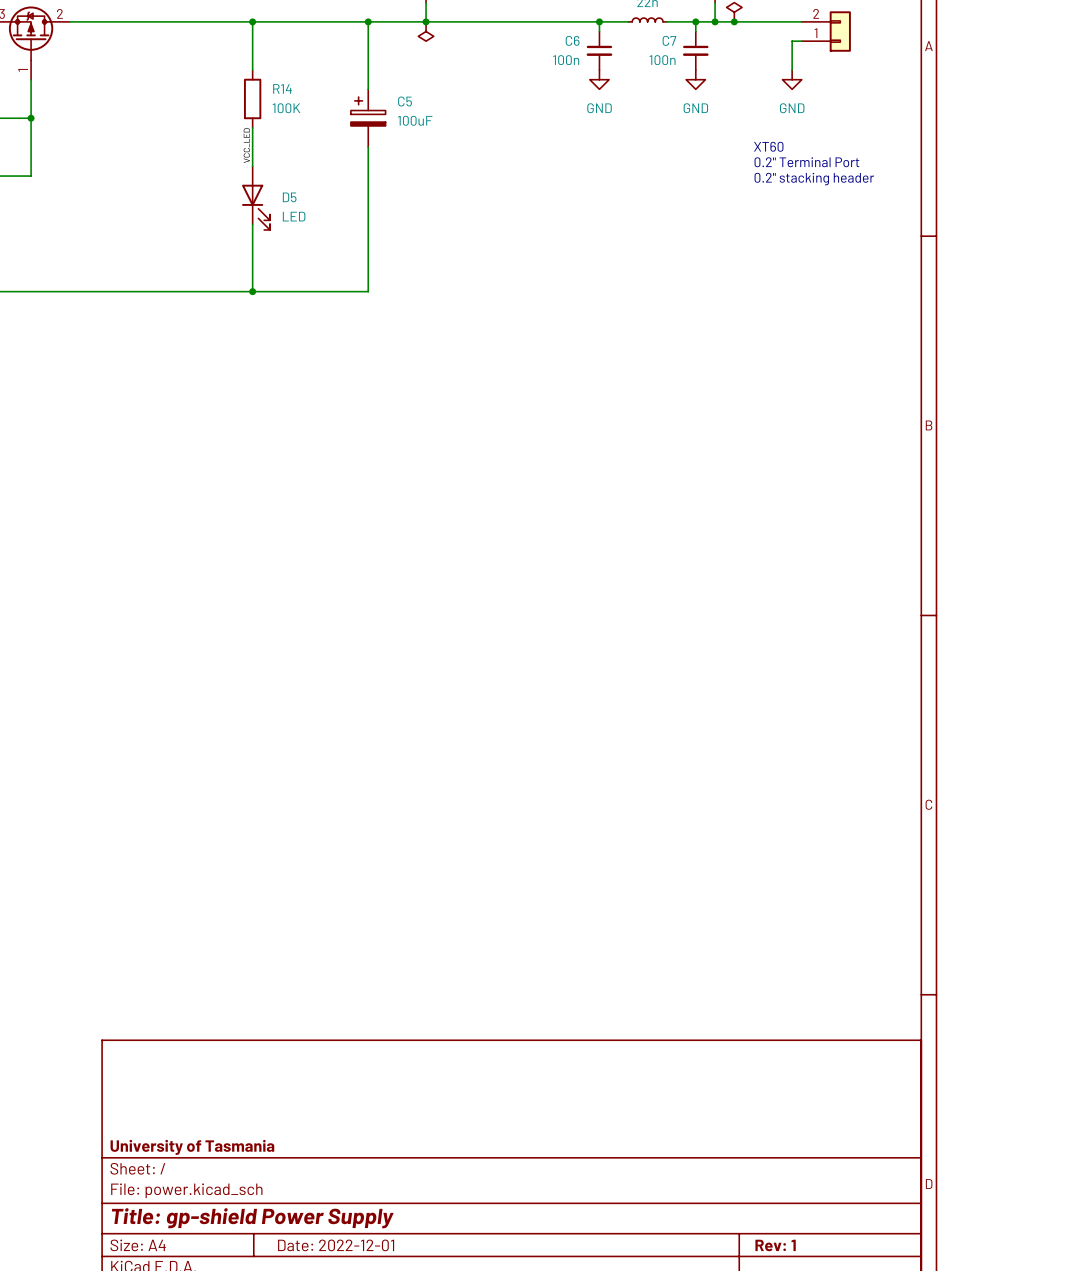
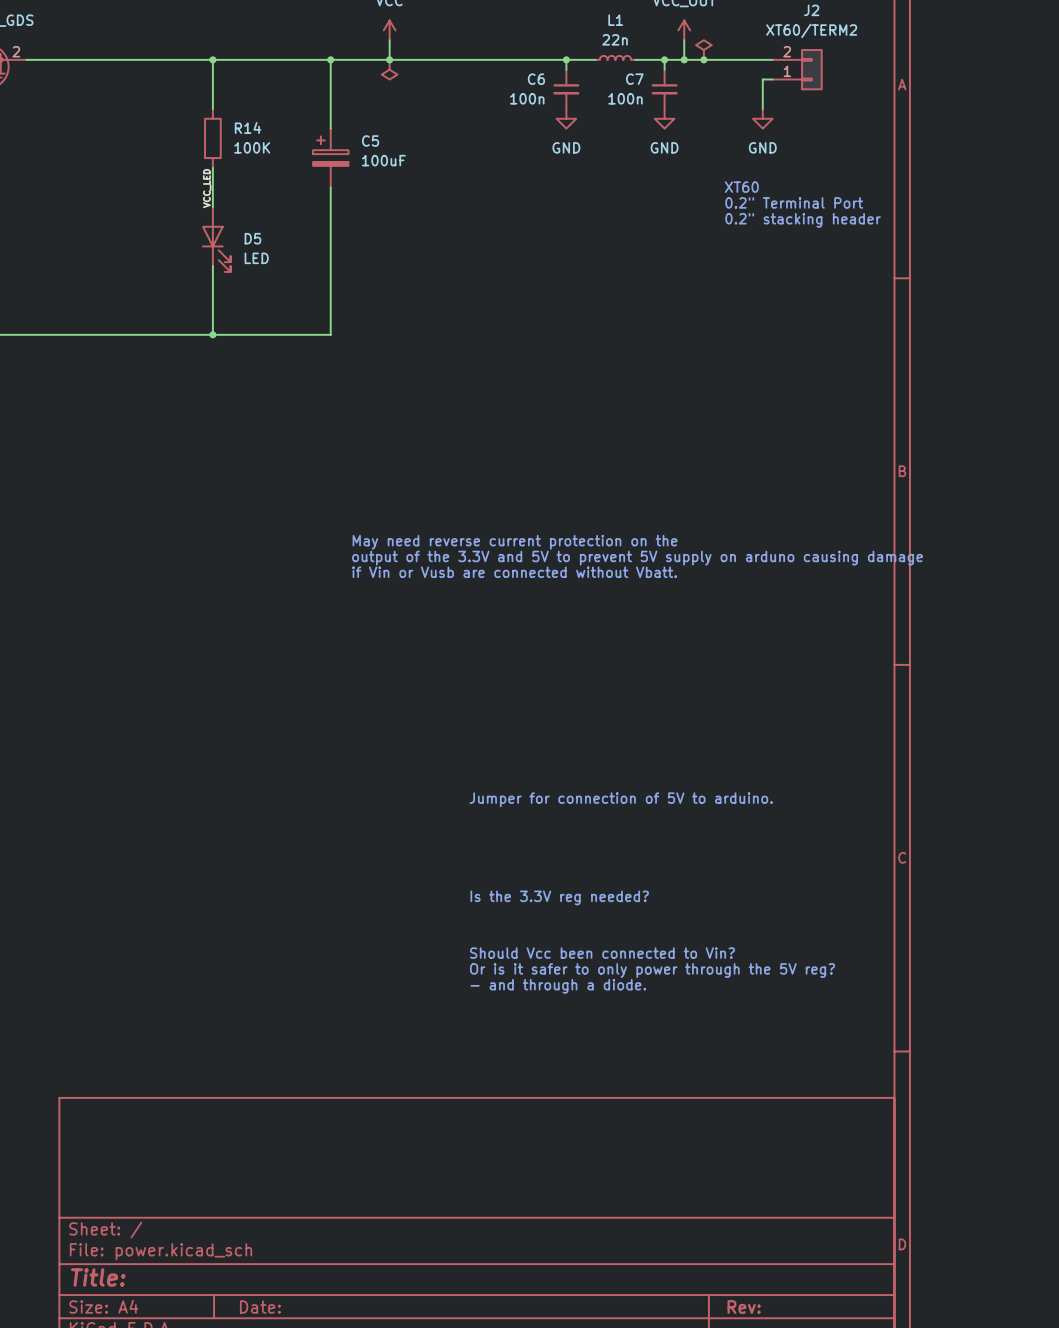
text: none -> May need reverse current protection on the (515, 542)
text: none -> output of the 3.3V and 5V to prevent 5V supply on arduno causing damage (637, 558)
text: none -> if Vin or Vusb are connected without Vbatt. (514, 572)
text: none -> Jumper for connection of 5V to arduino. (621, 799)
text: none -> Is the 3.3V reg needed? (559, 897)
text: none -> Should Vcc been connected to Vin? (602, 953)
text: none -> Or is it safer to only power through the 5V reg? (652, 970)
text: none -> - and through a diode. (558, 986)
title block: University of Tasmania (192, 1147) -> none
title block: Title: gp-shield Power Supply (252, 1218) -> Title: (98, 1277)
title block: Date: 2022-12-01 (336, 1245) -> Date: (260, 1307)
title block: Rev: 1 (775, 1245) -> Rev: (744, 1307)

